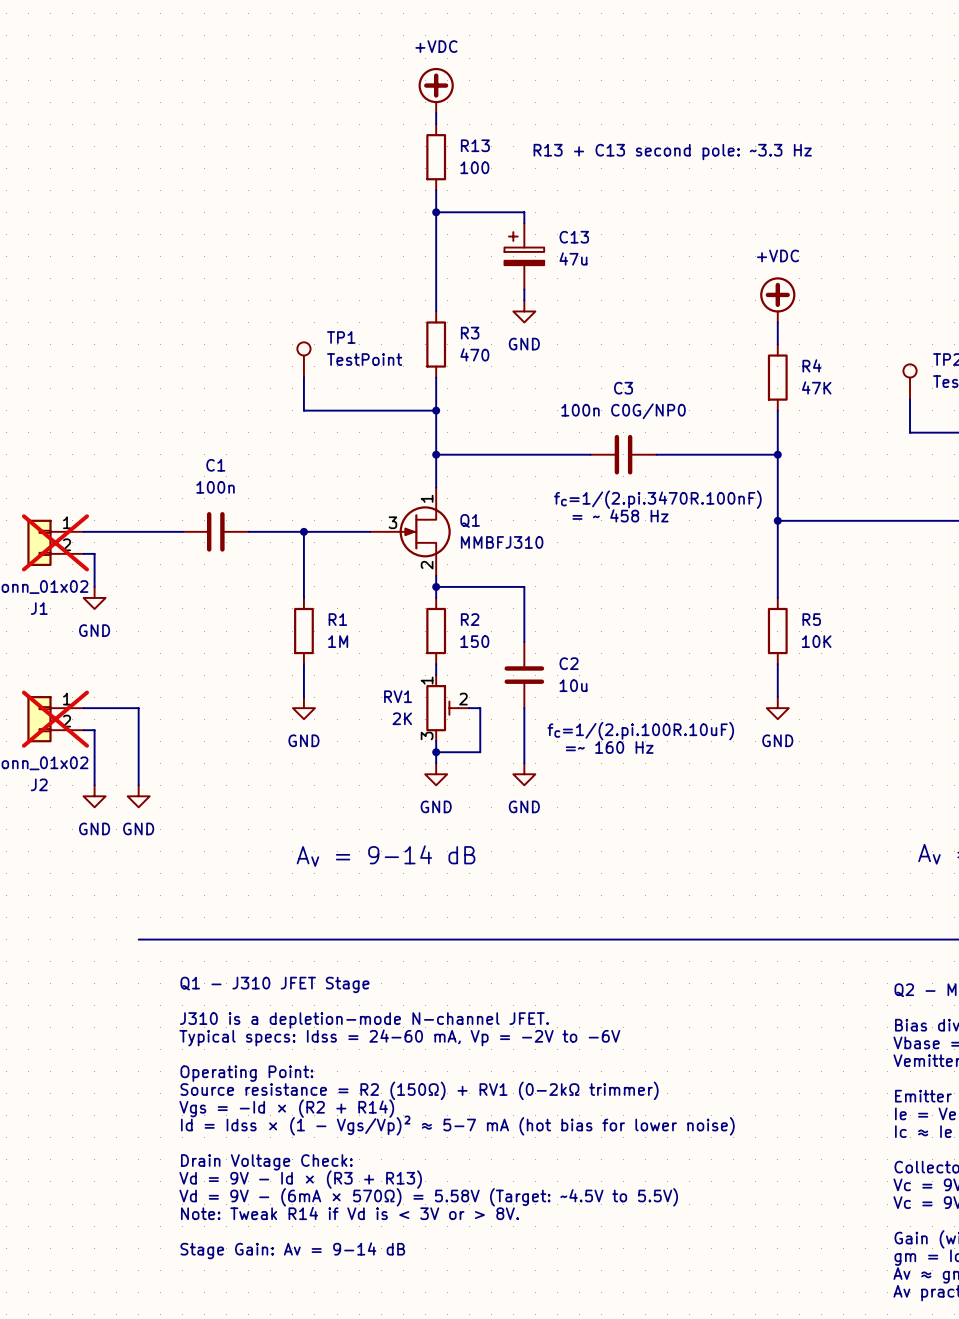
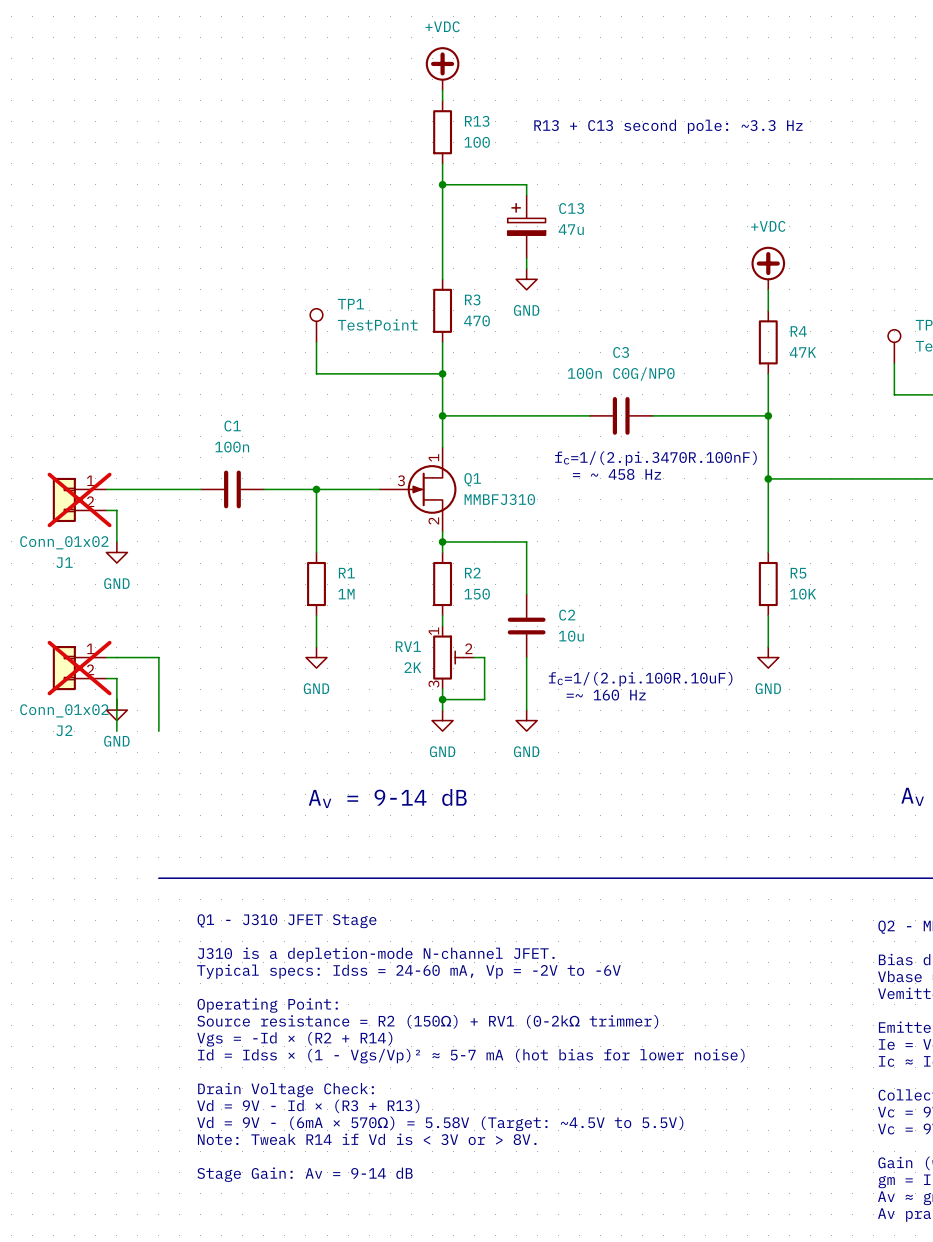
power symbol: none -> GND (116, 710)
power symbol: GND (94, 796) -> none
power symbol: GND (138, 796) -> none

